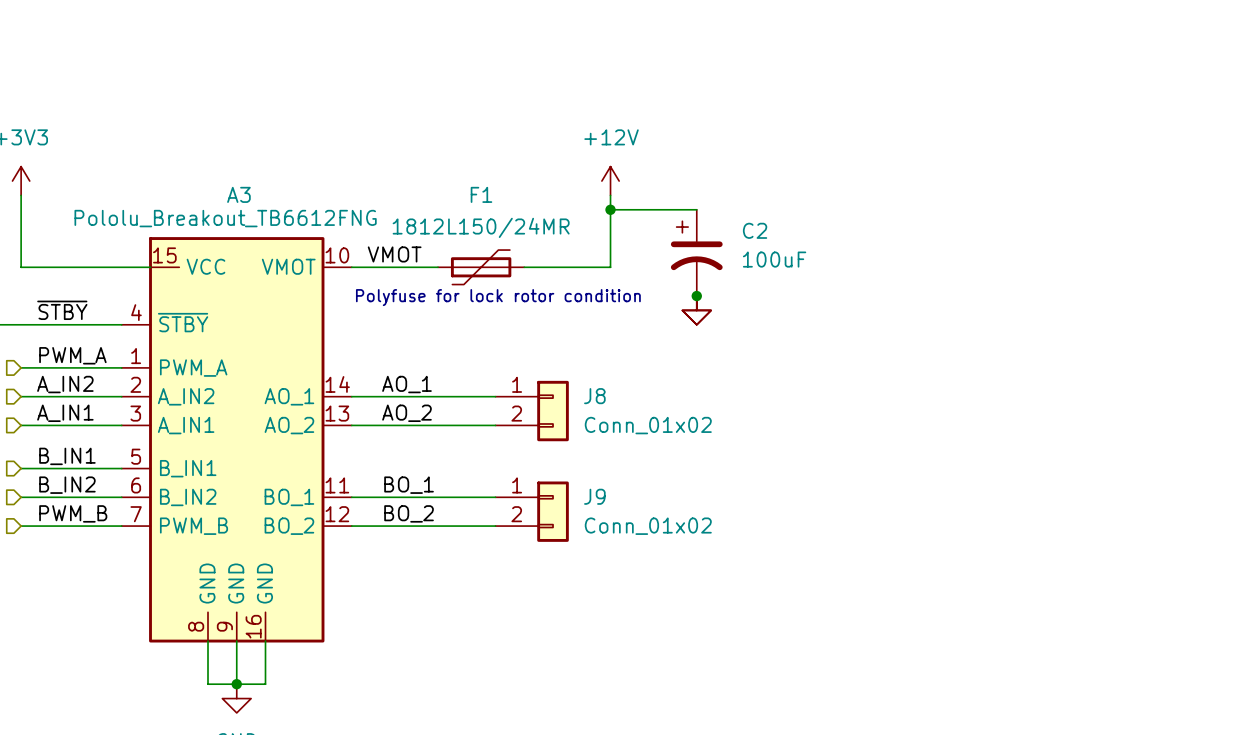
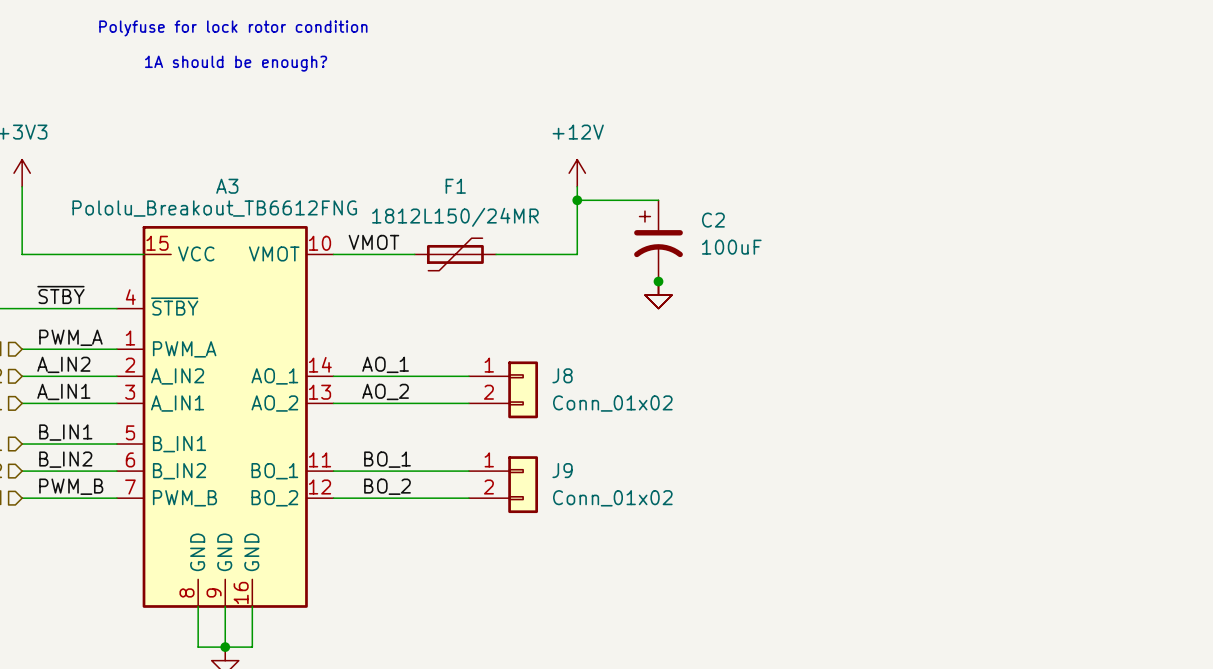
text: none -> Polyfuse for lock rotor condition (233, 28)
text: none -> 1A should be enough? (236, 63)
text: Polyfuse for lock rotor condition (498, 297) -> none

